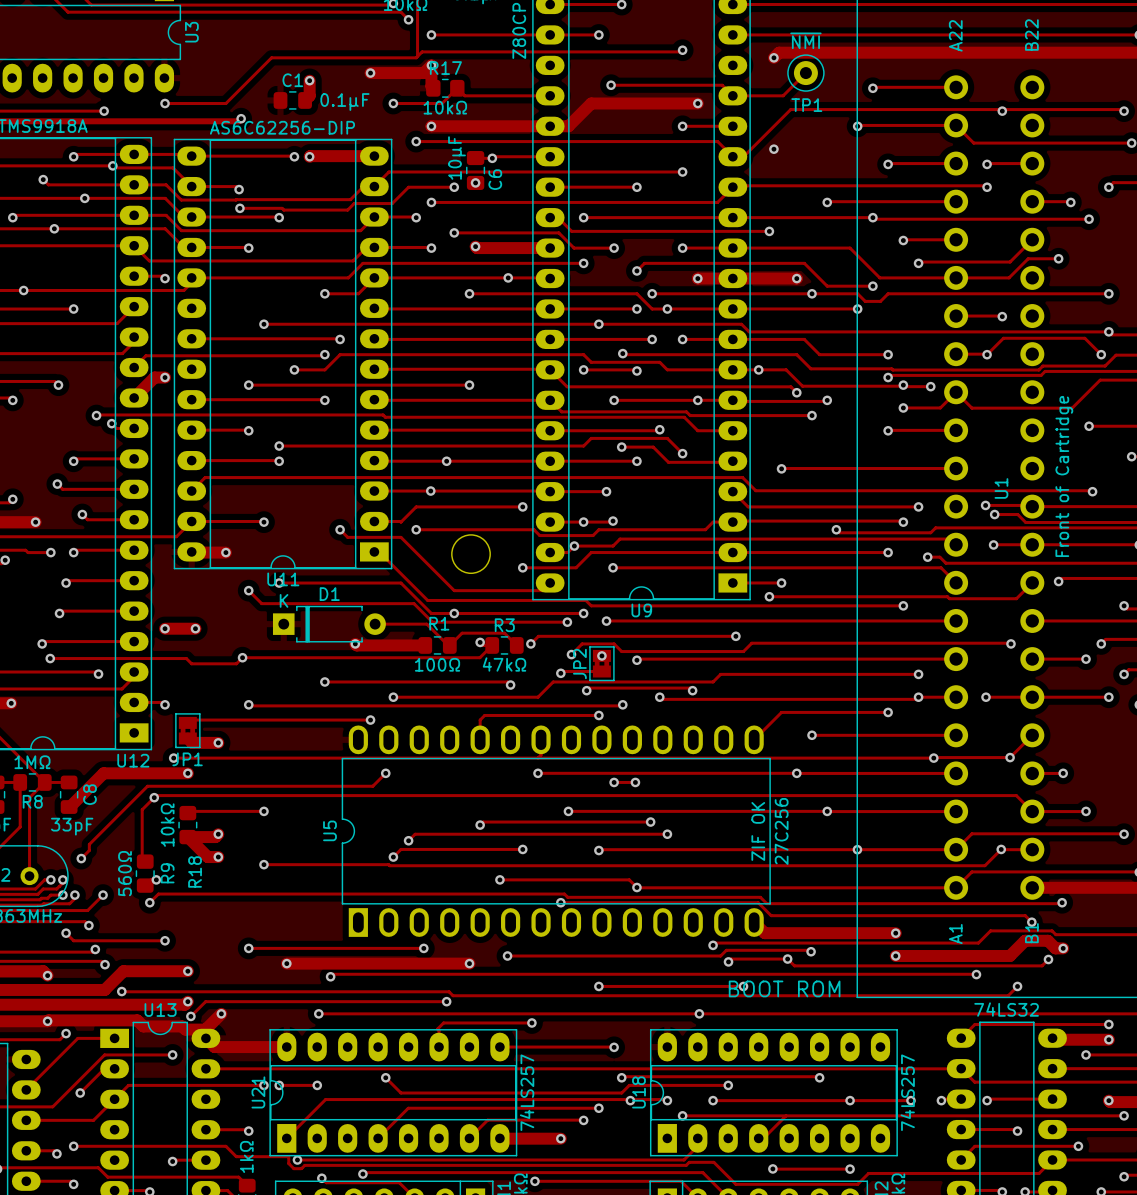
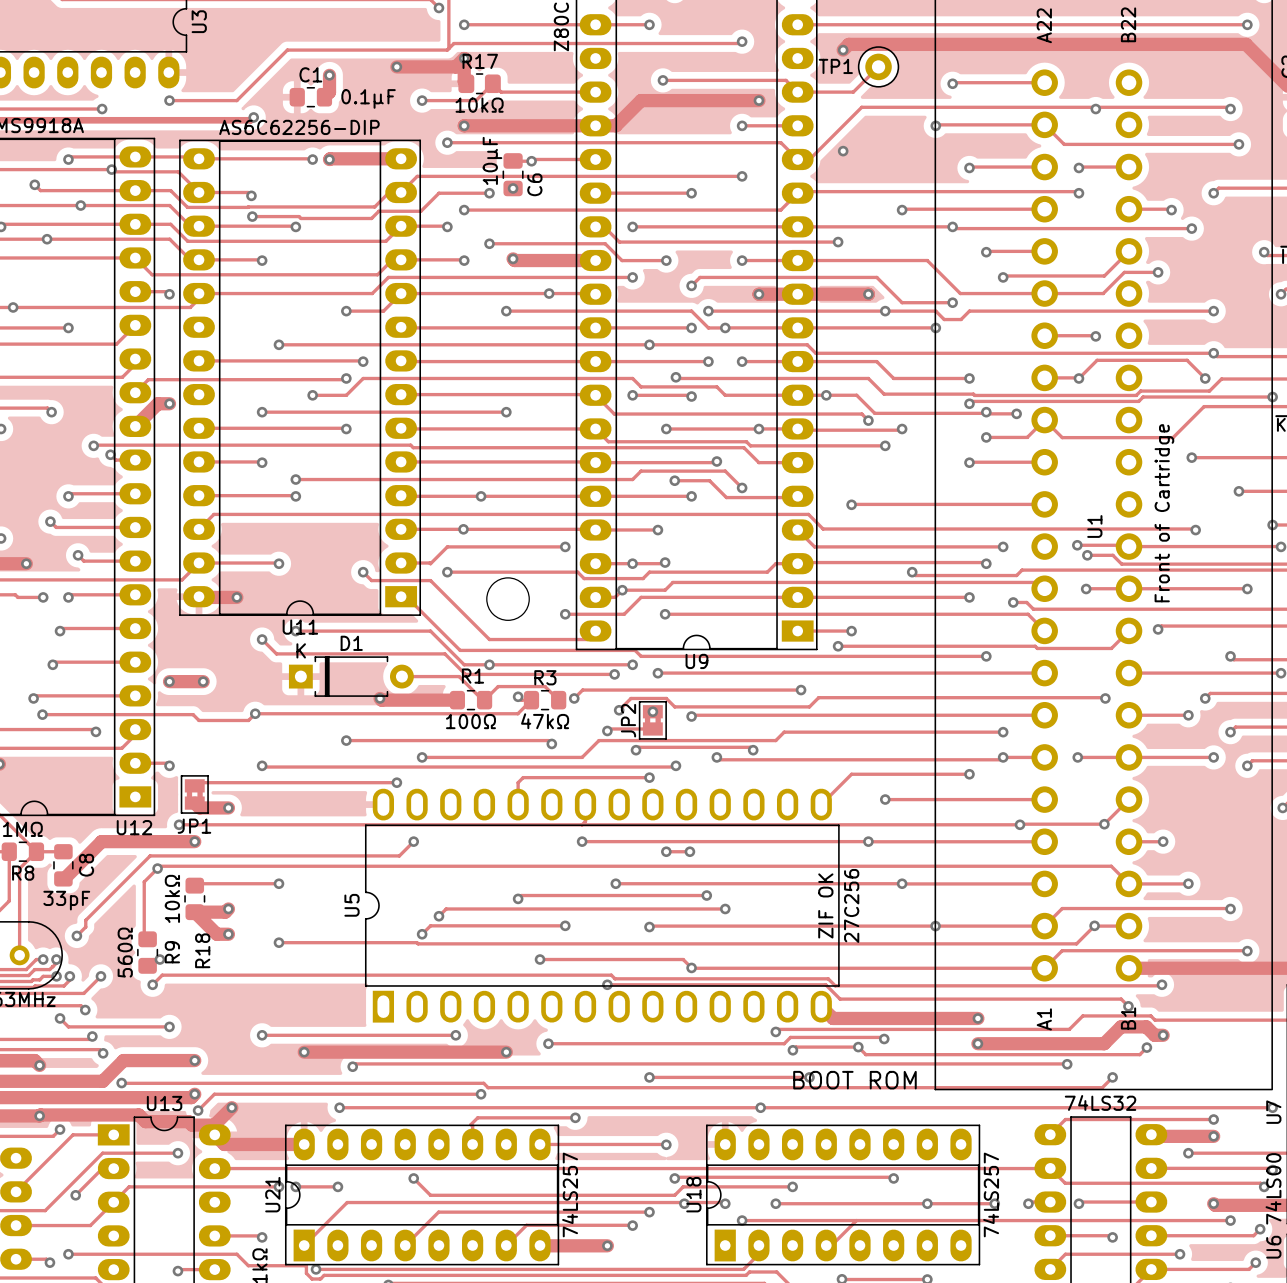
TP1 value: ~{NMI} (805, 40) -> none
TP1 name position: TP1 (806, 105) -> TP1 (835, 66)

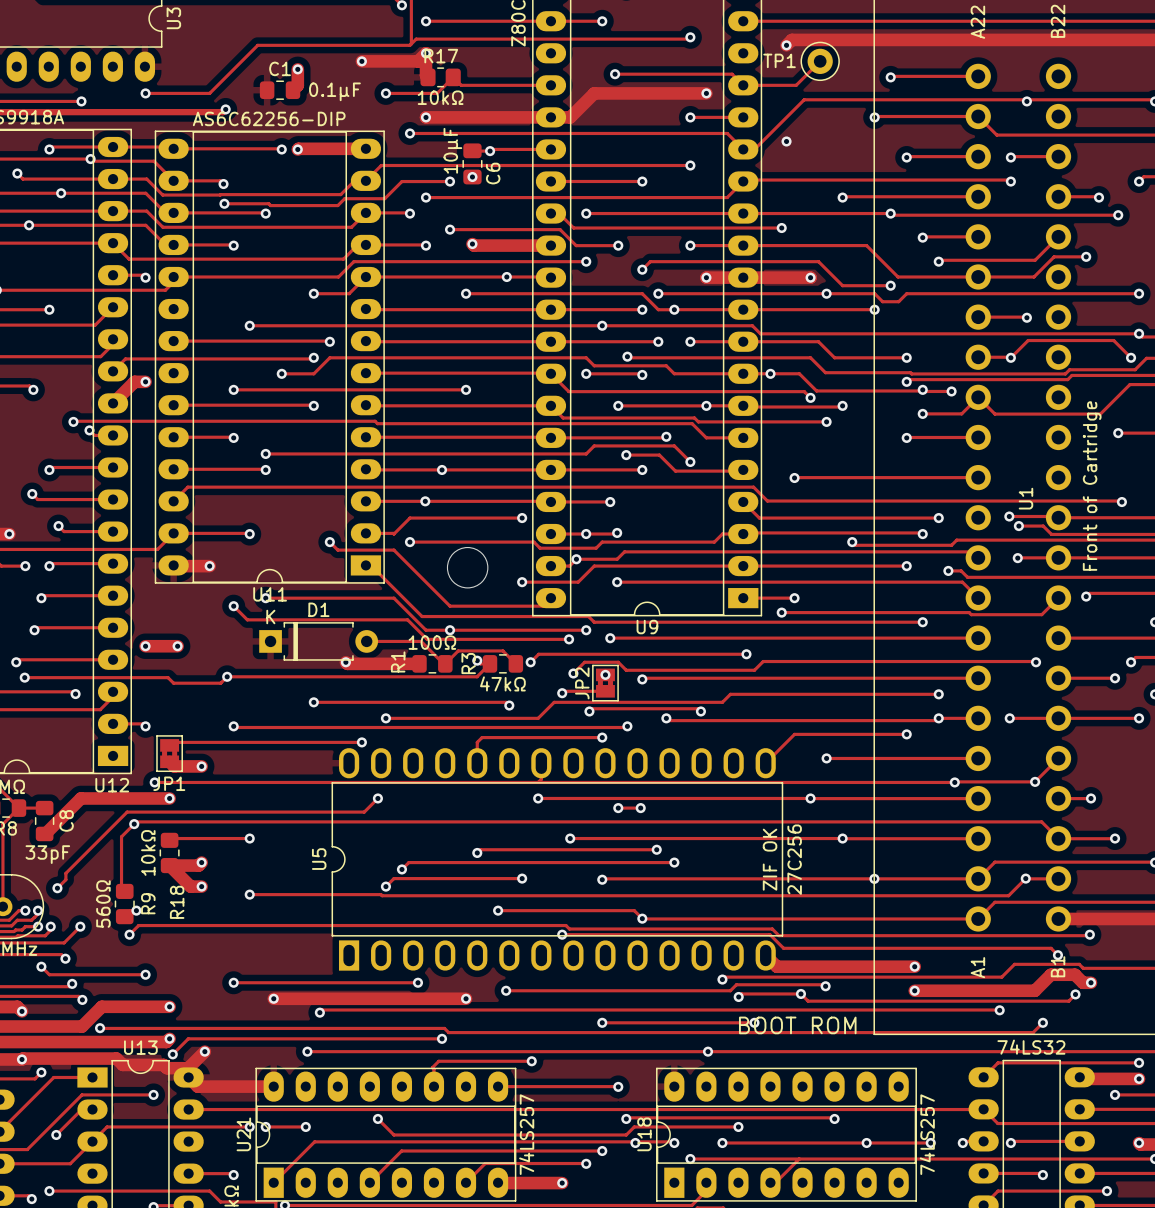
R1 name rotation: 0° (472, 676) -> 90° counterclockwise (398, 661)
R1 name position: R1 (472, 676) -> R1 (398, 661)
R3 name rotation: 0° (545, 677) -> 90° counterclockwise (468, 663)
R3 name position: R3 (545, 677) -> R3 (468, 663)
R1 value position: 100Ω (470, 721) -> 100Ω (432, 642)

